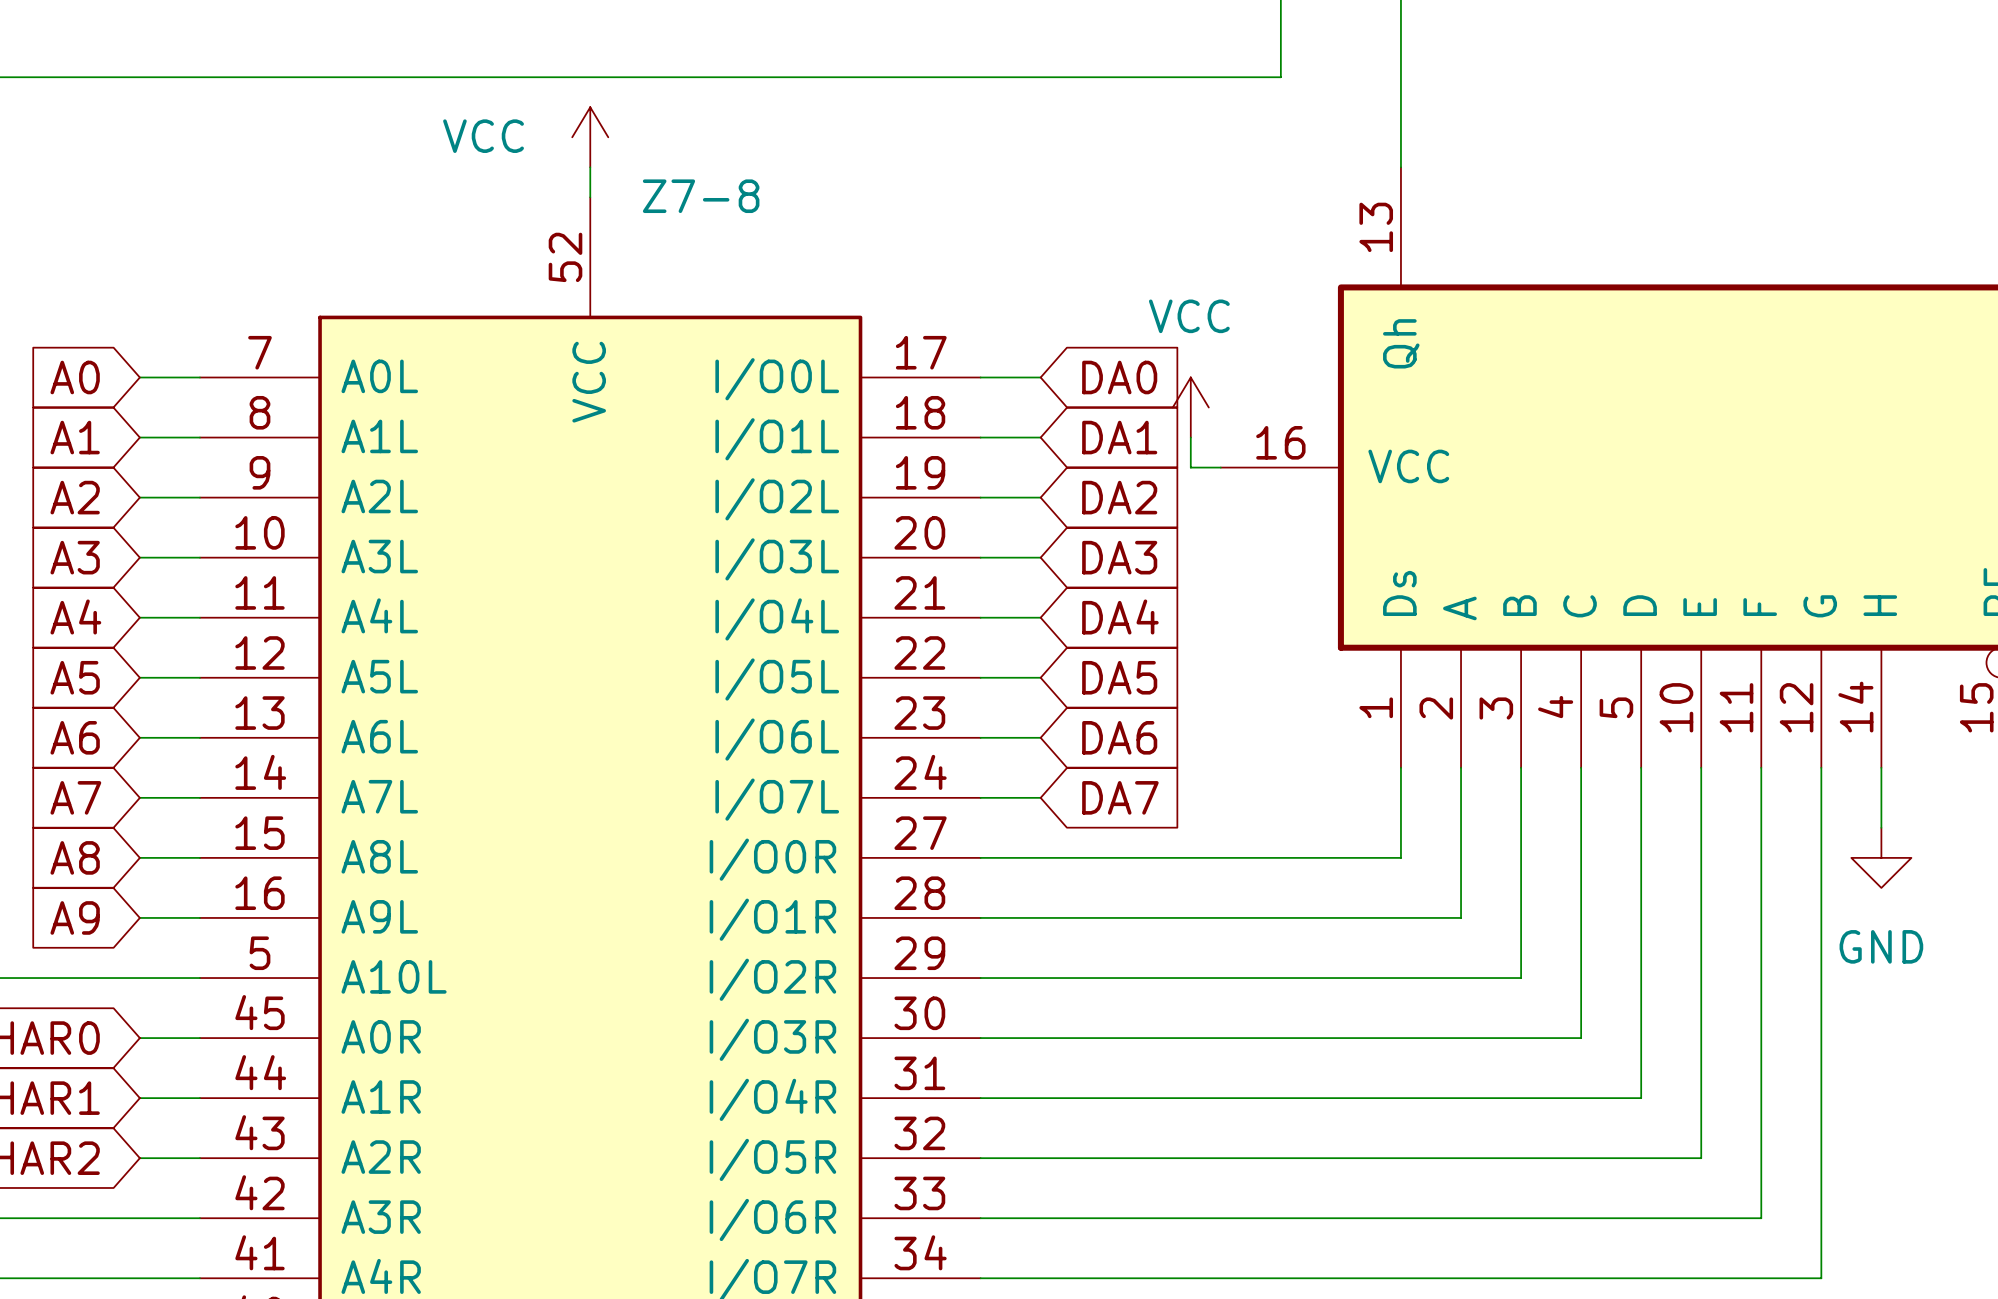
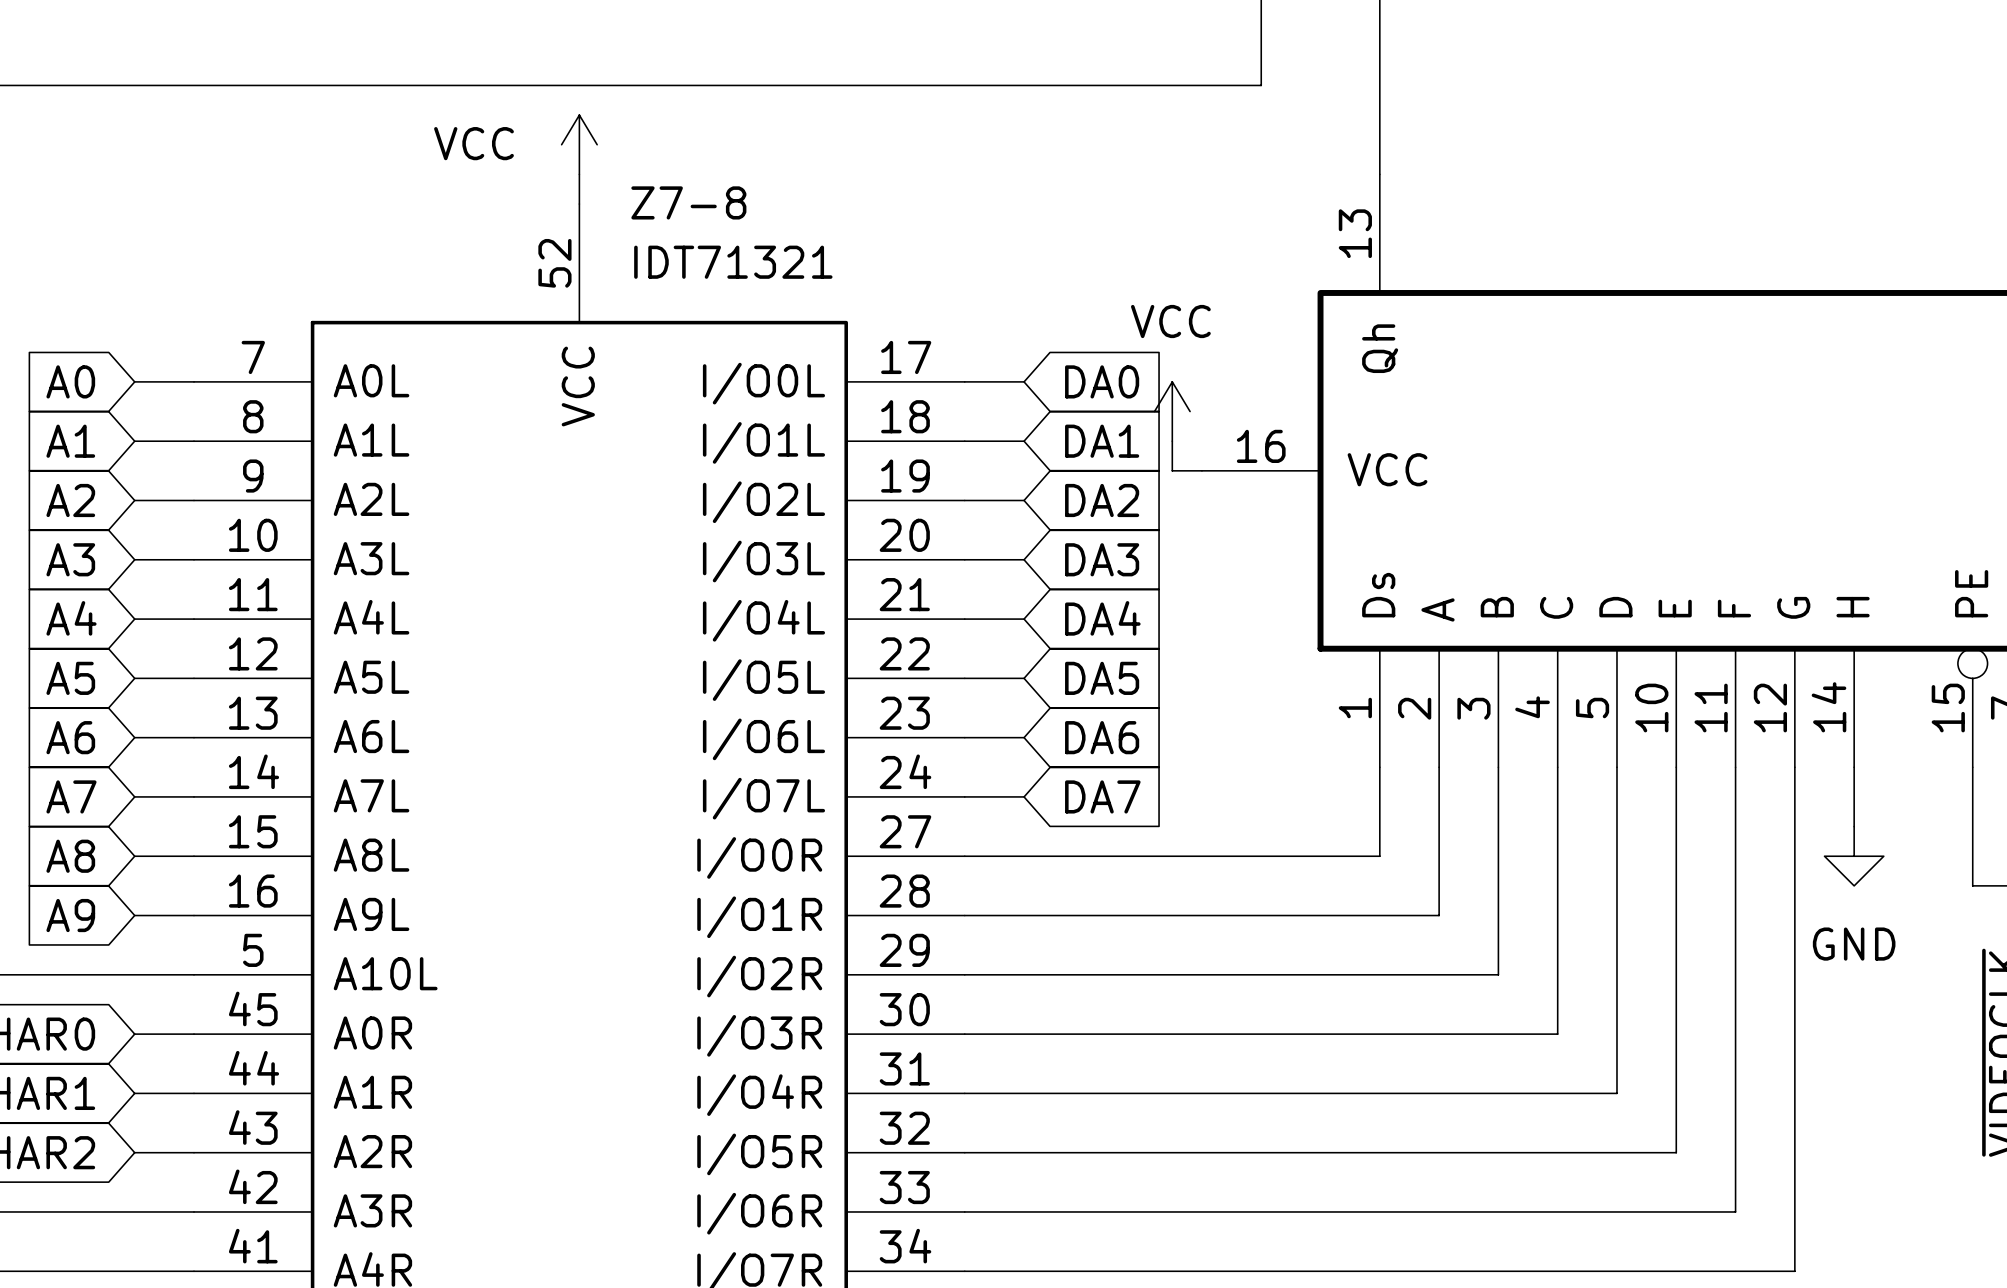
Z7-8 value: none -> IDT71321 (733, 262)

